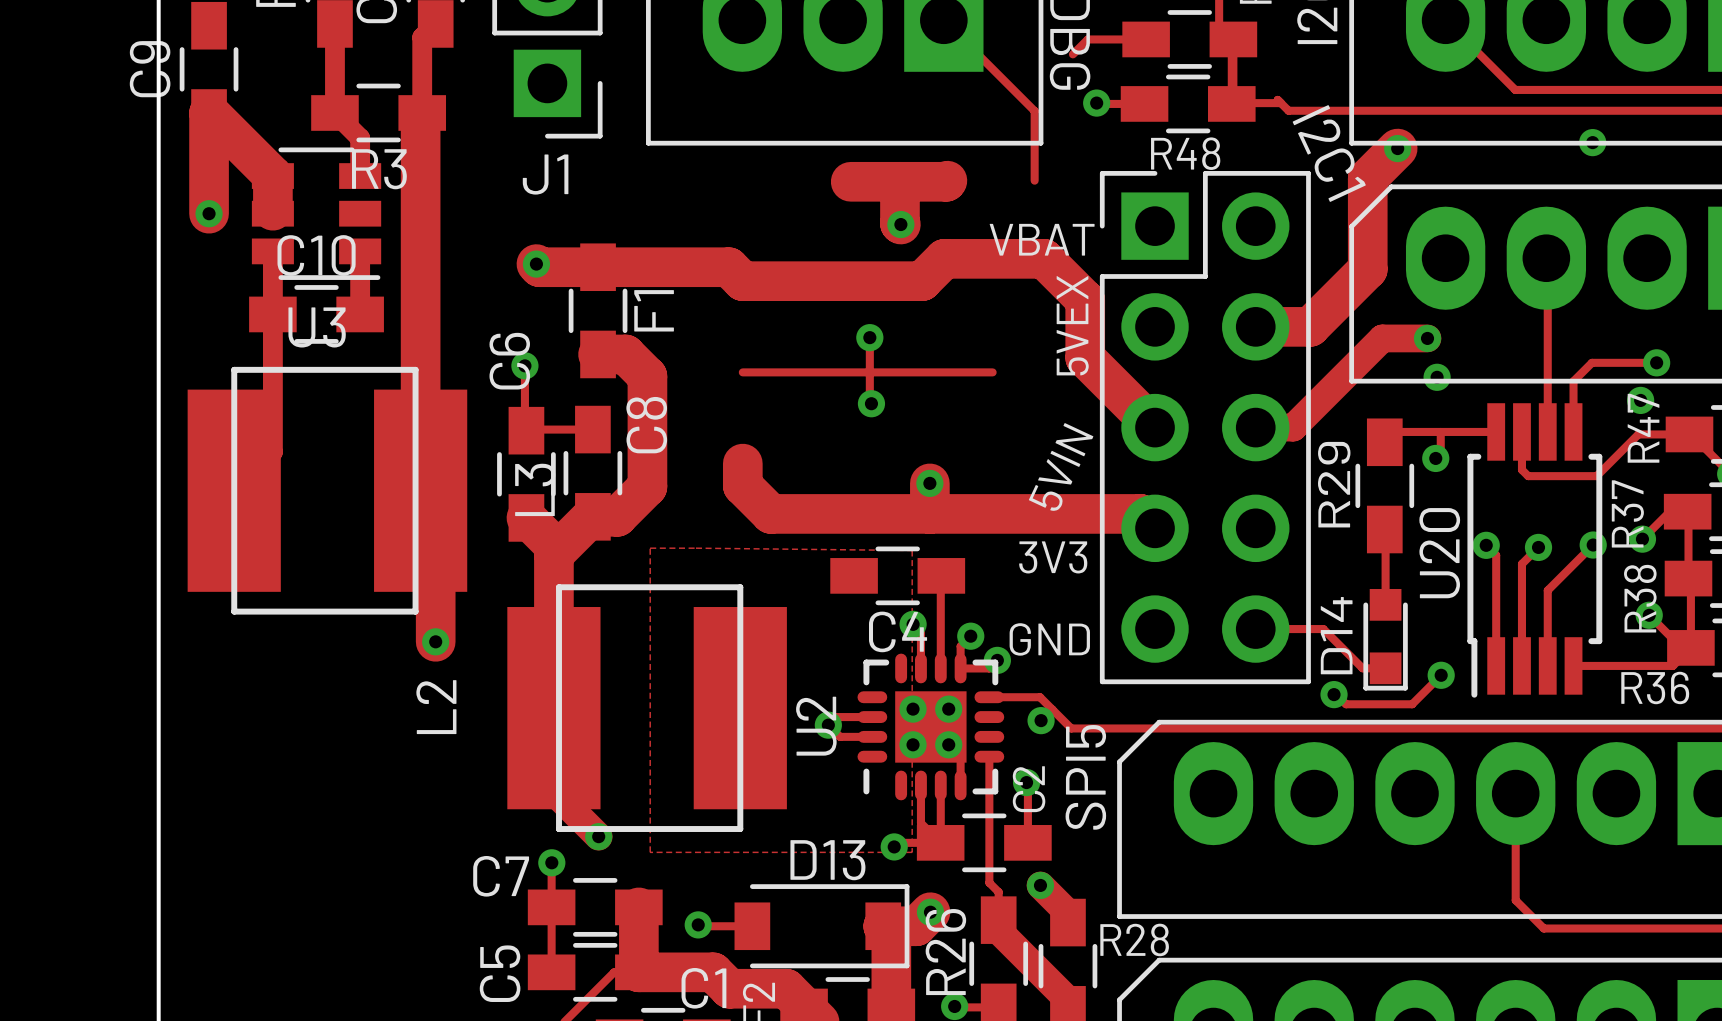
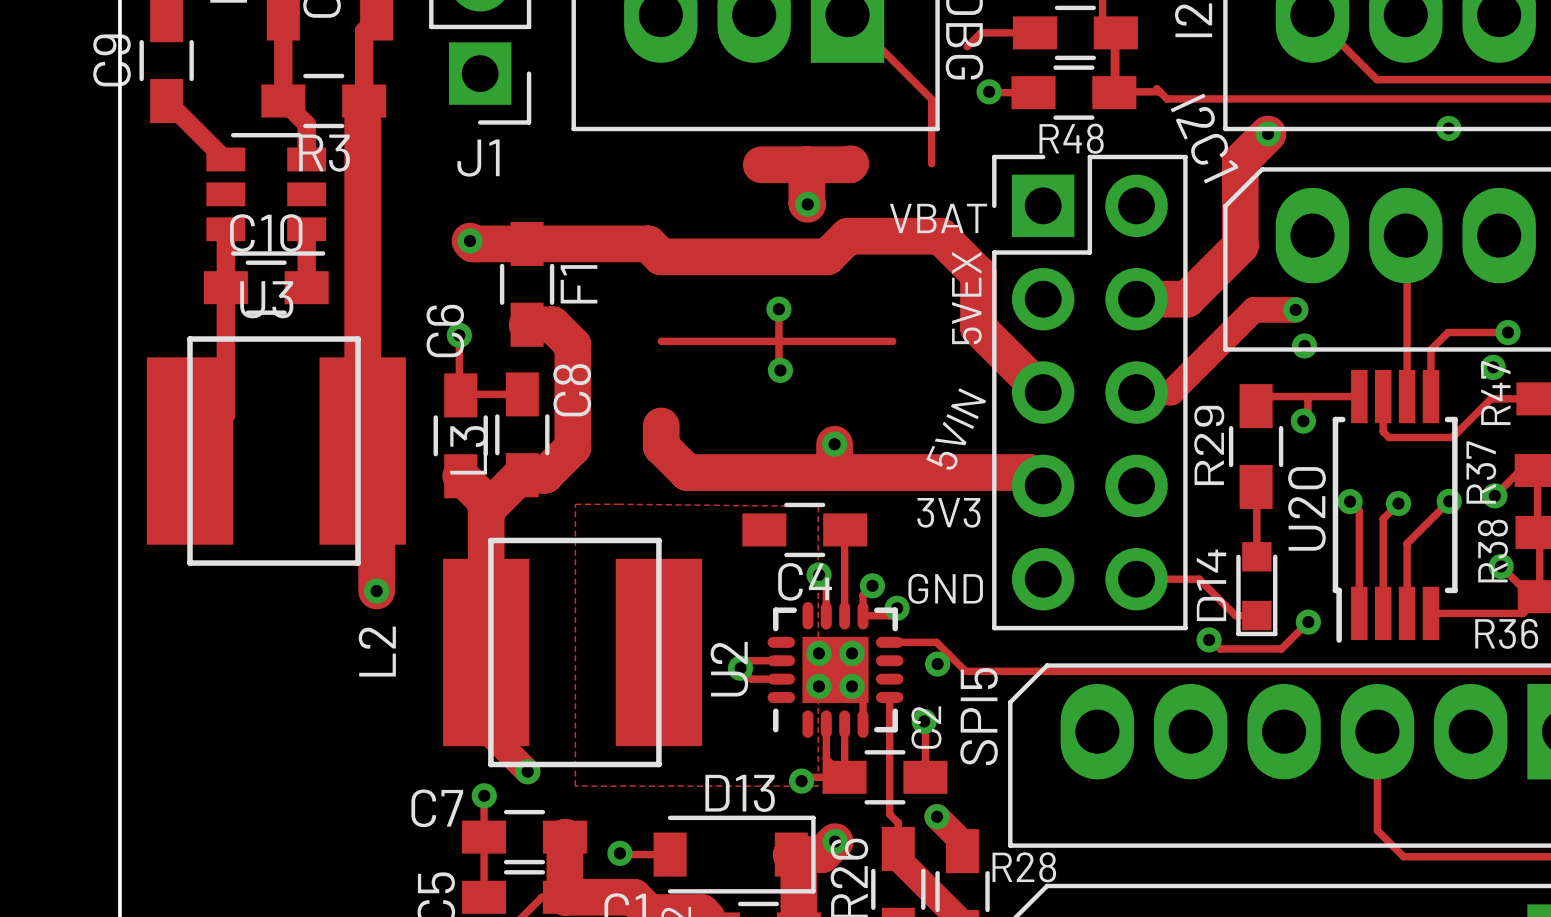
track: (209, 112) (272, 176) (272, 210) -> (166, 101) (225, 159)
track: (209, 112) (209, 213) -> none
via: (209, 213) -> none

